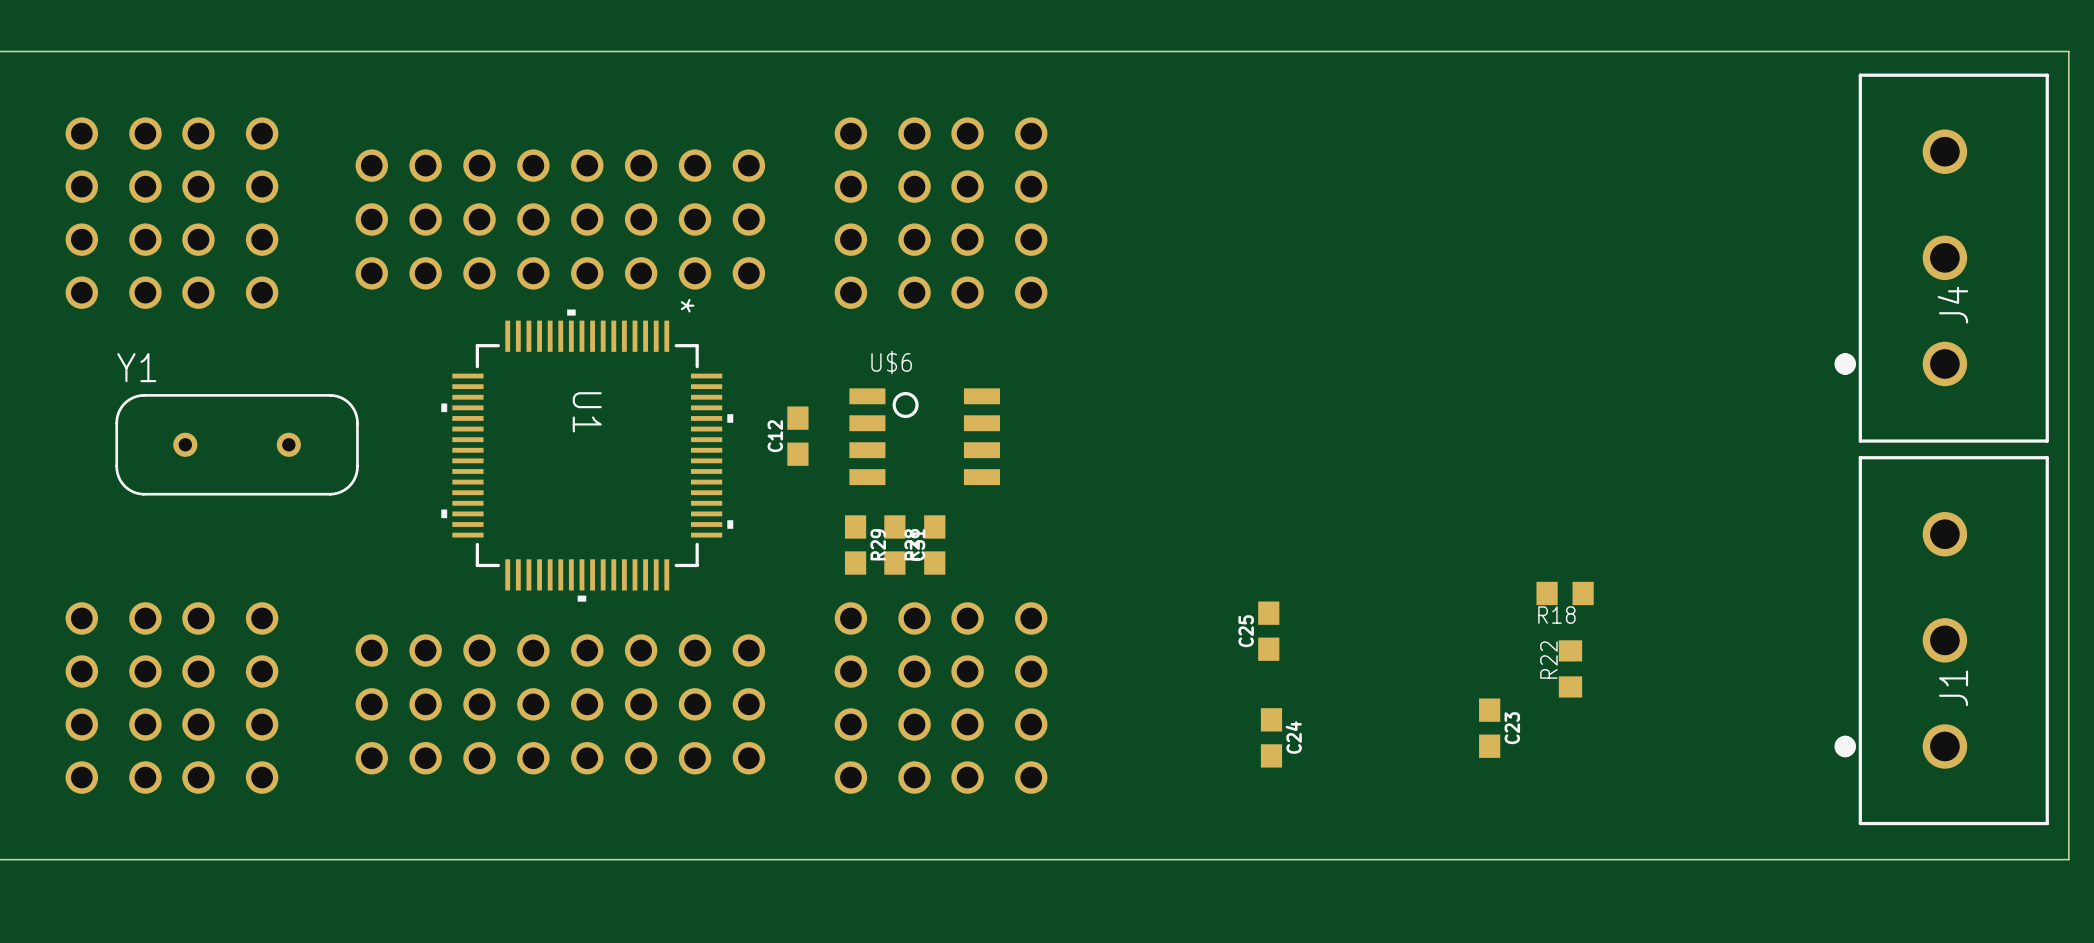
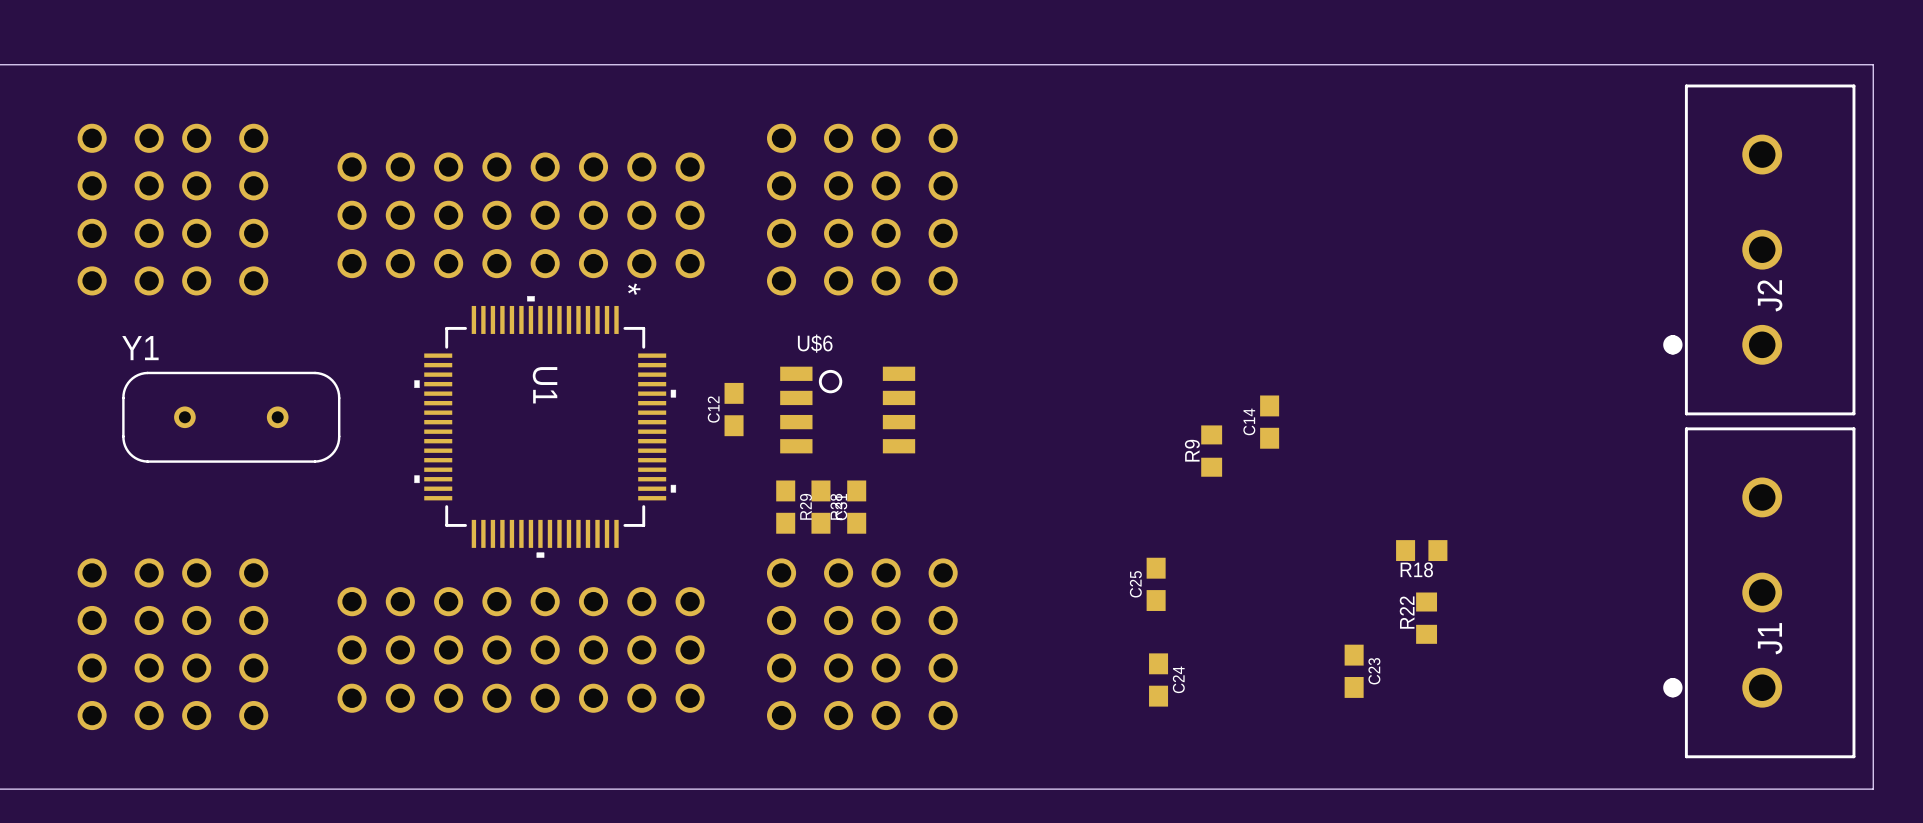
J4 name: J4 (1952, 305) -> J2 (1769, 295)
C14: none -> (1269, 422)
R9: none -> (1211, 451)

